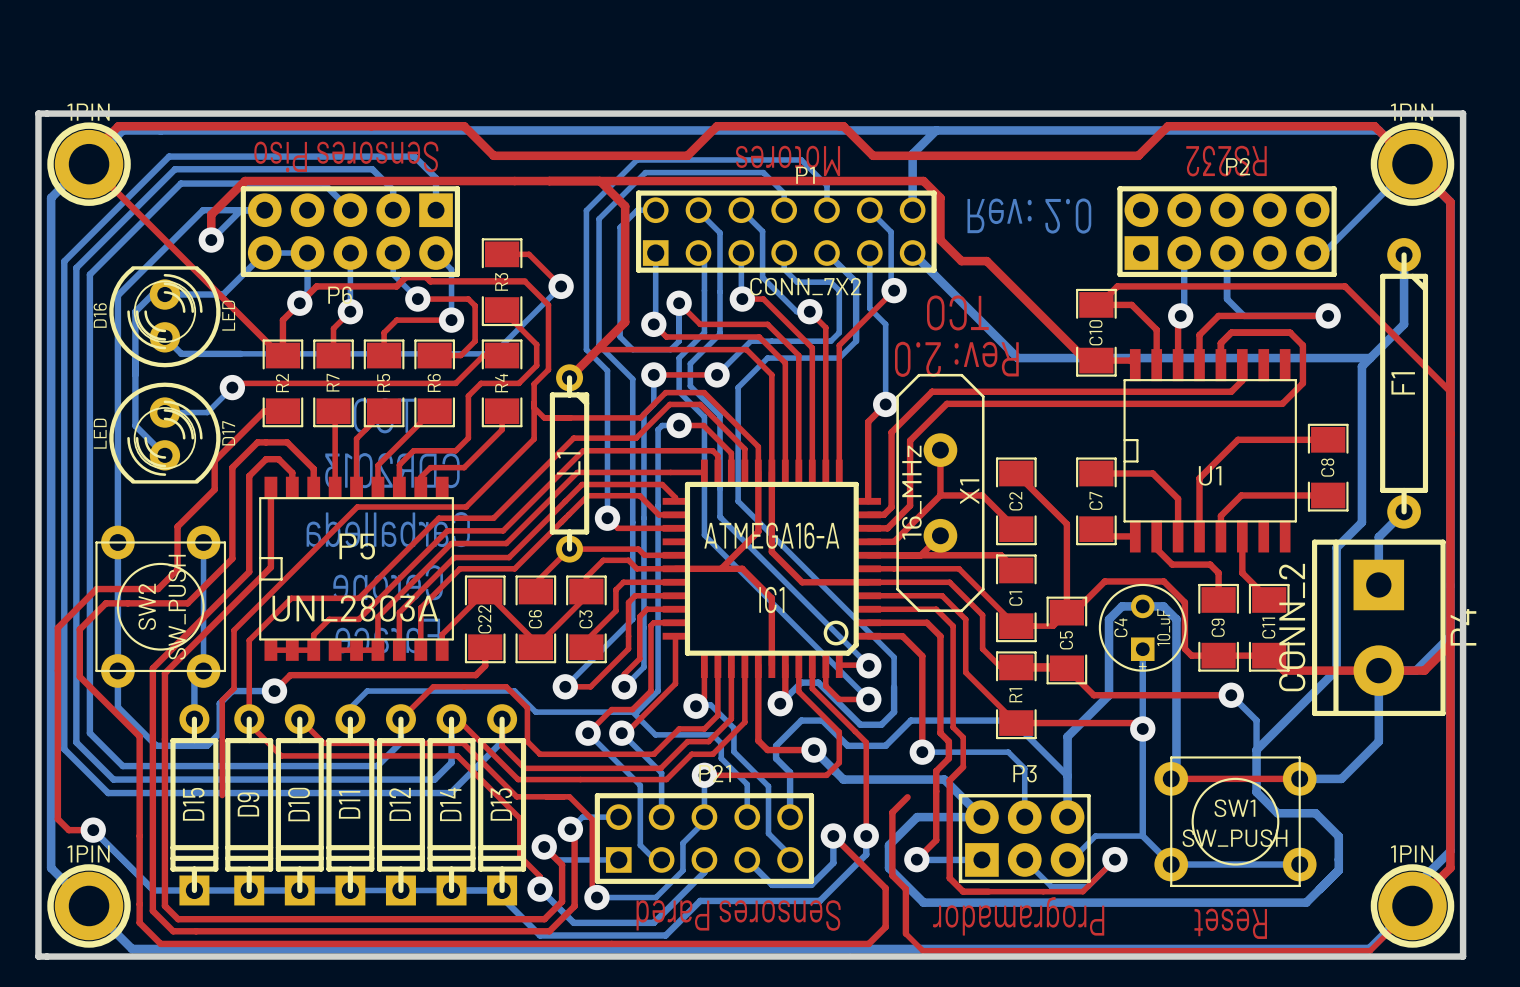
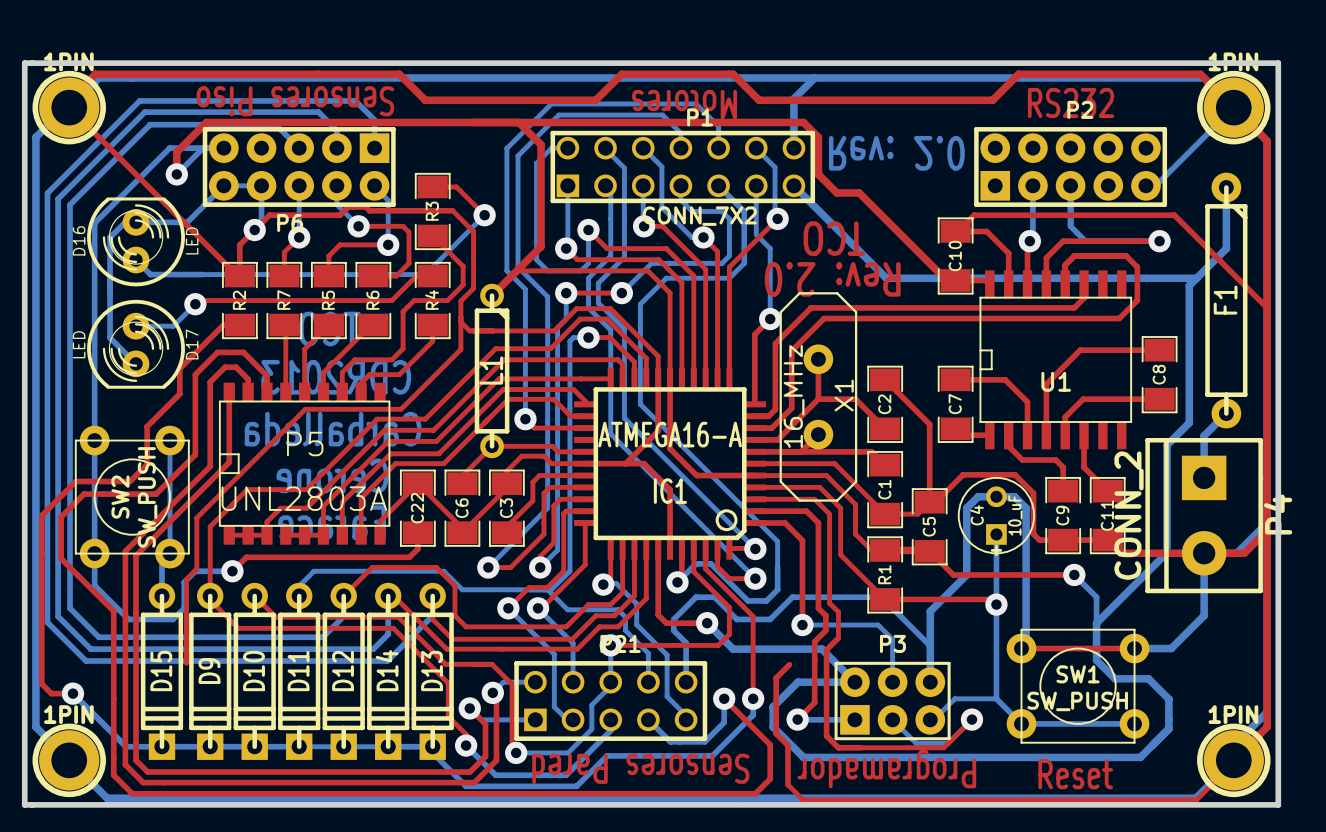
text rotation: 0° (1226, 161) -> 180° (1071, 102)
text rotation: 0° (1230, 923) -> 180° (1075, 774)

